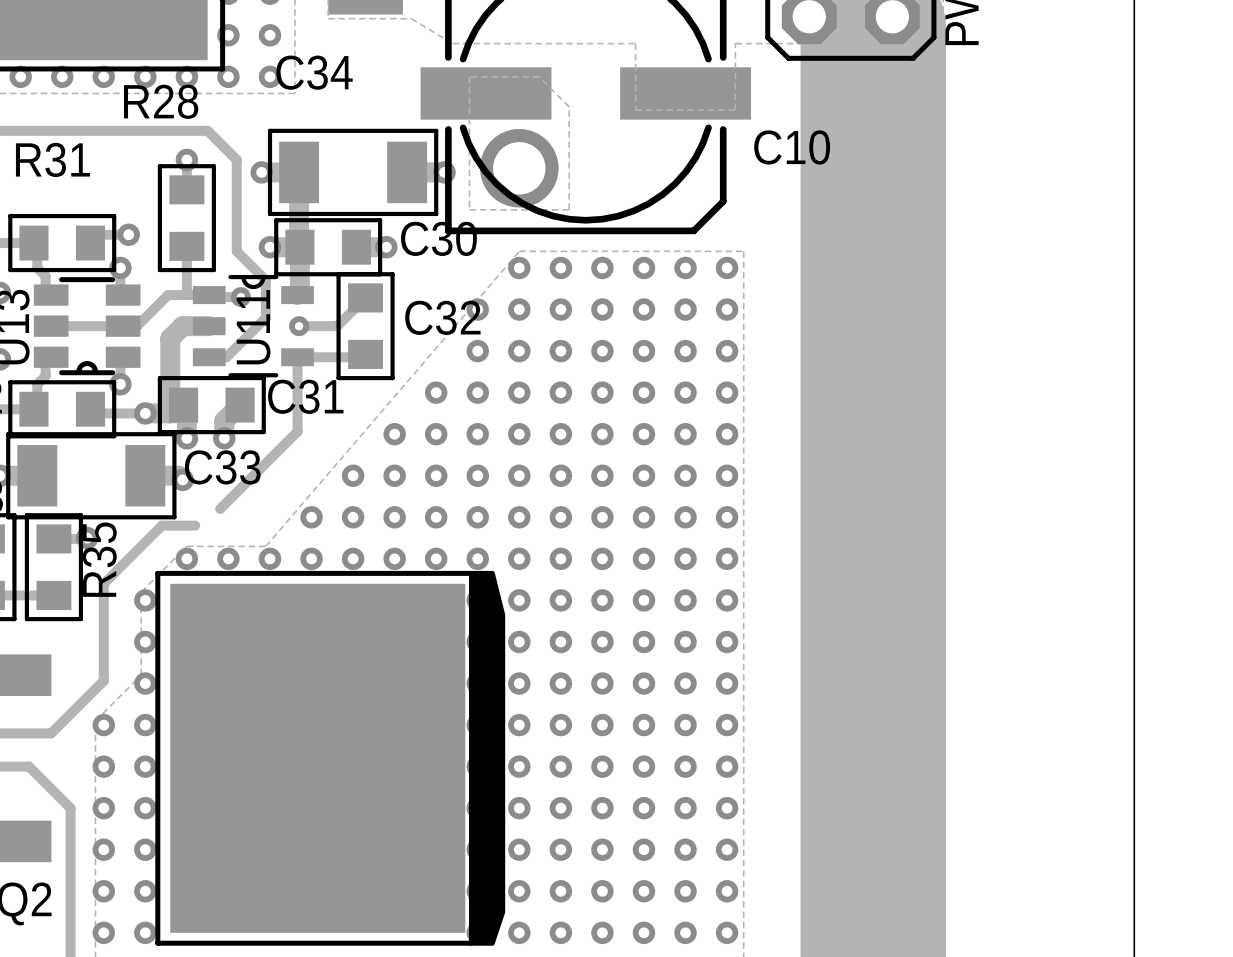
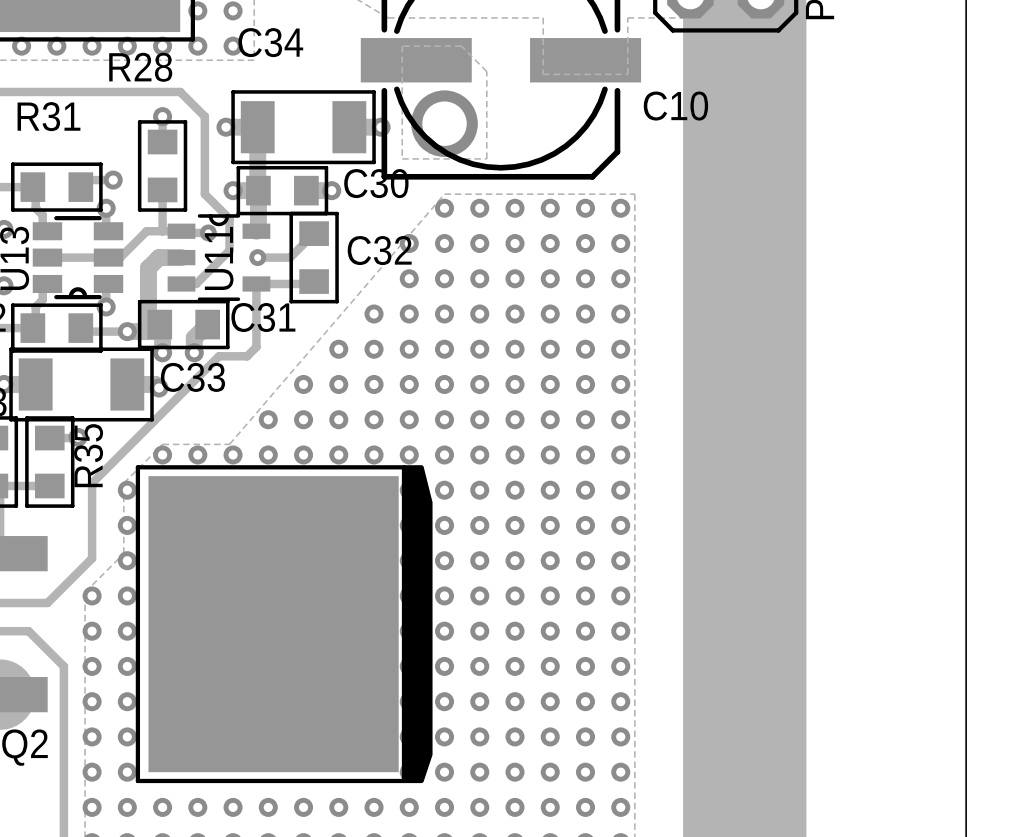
track: (286, 442) (220, 508) -> none
track: (195, 525) (161, 525) (103, 583) (103, 592) -> (247, 356) (218, 356) (92, 483)

